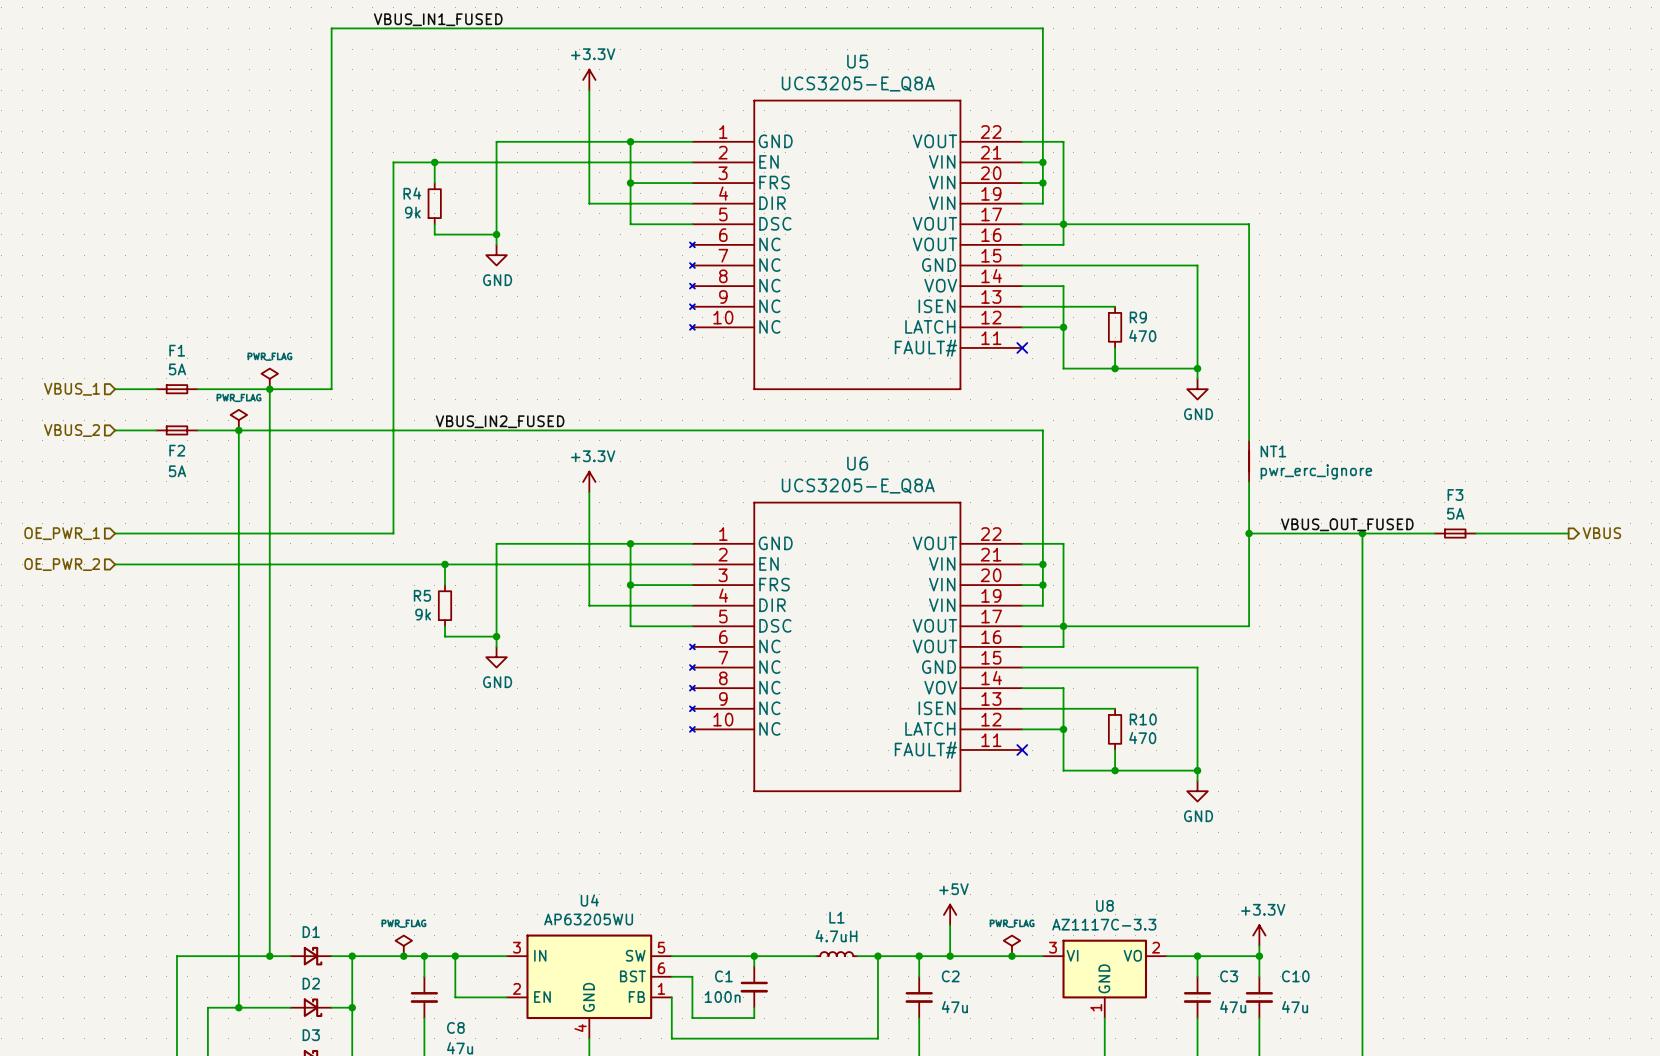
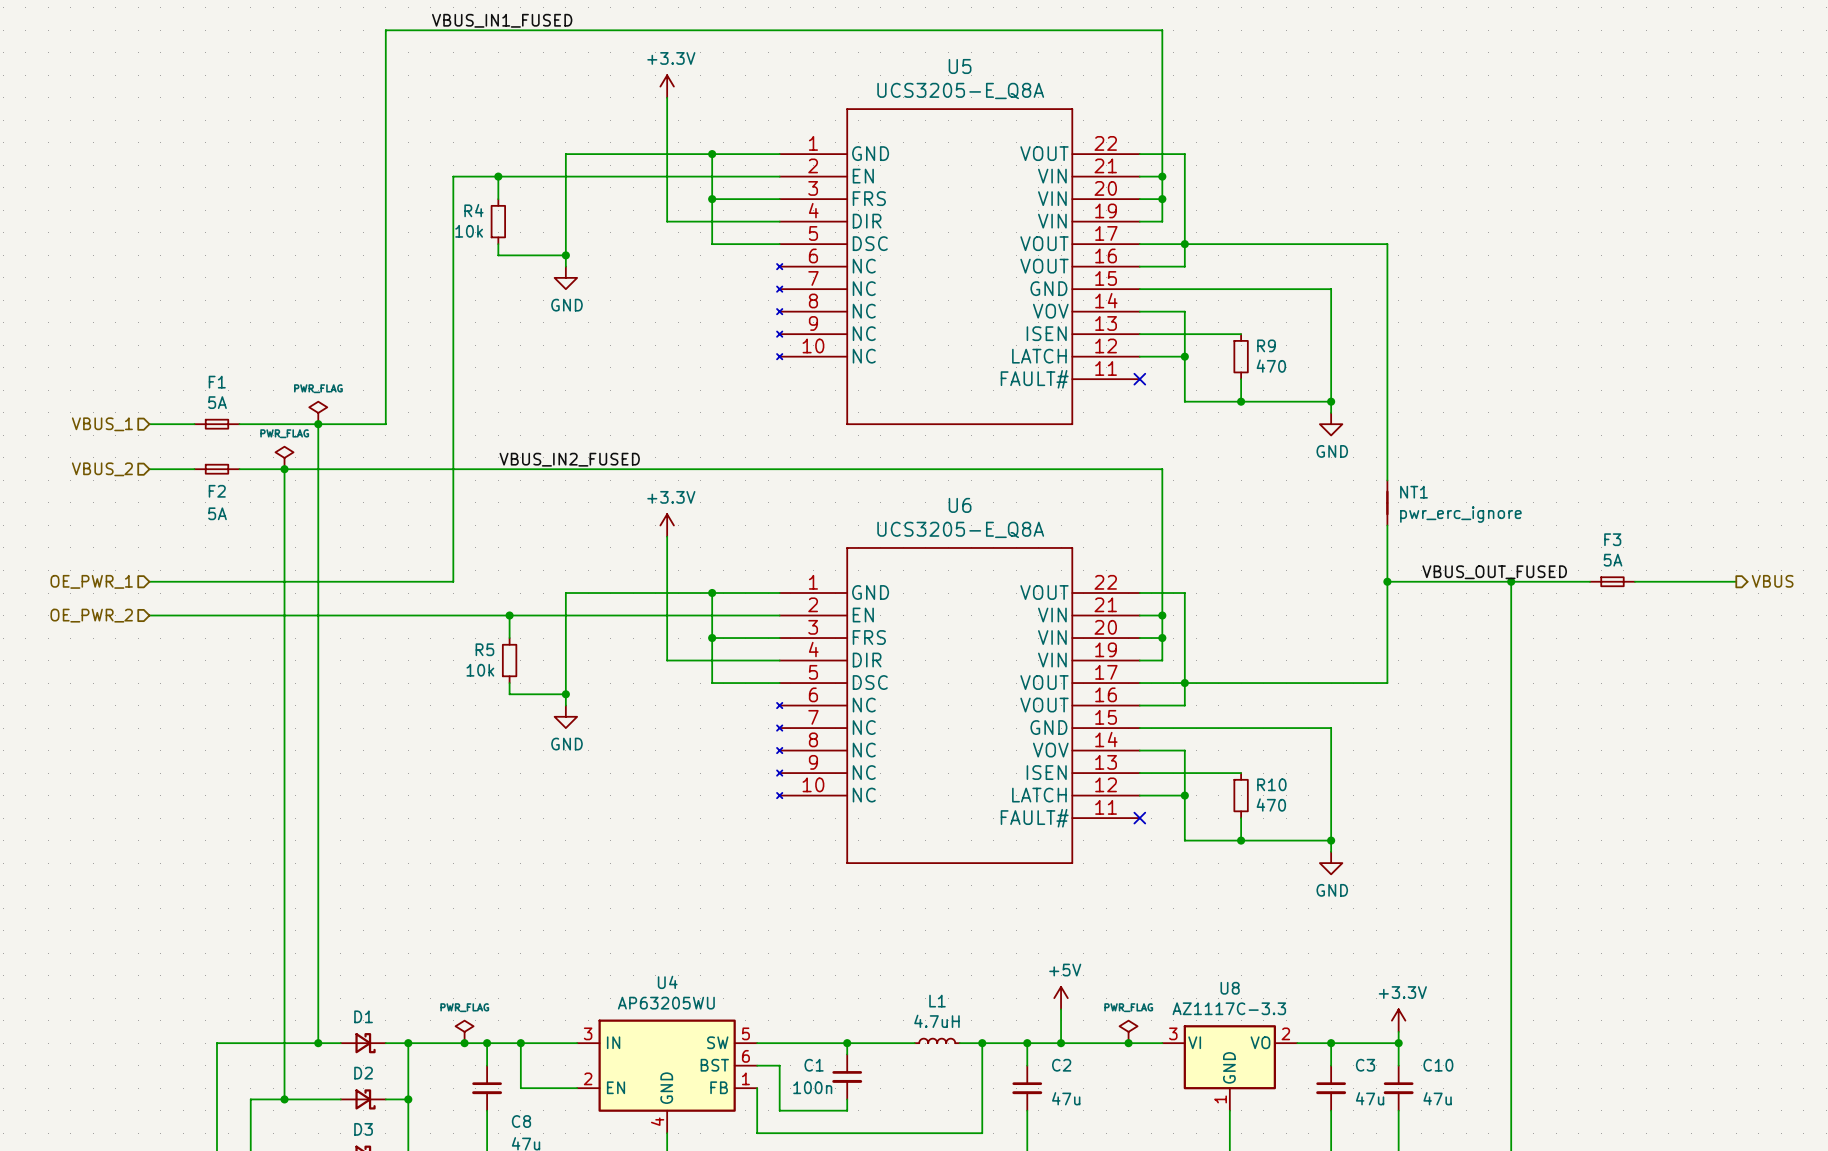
R4 value: 9k (412, 212) -> 10k (469, 231)
R5 value: 9k (423, 614) -> 10k (480, 670)

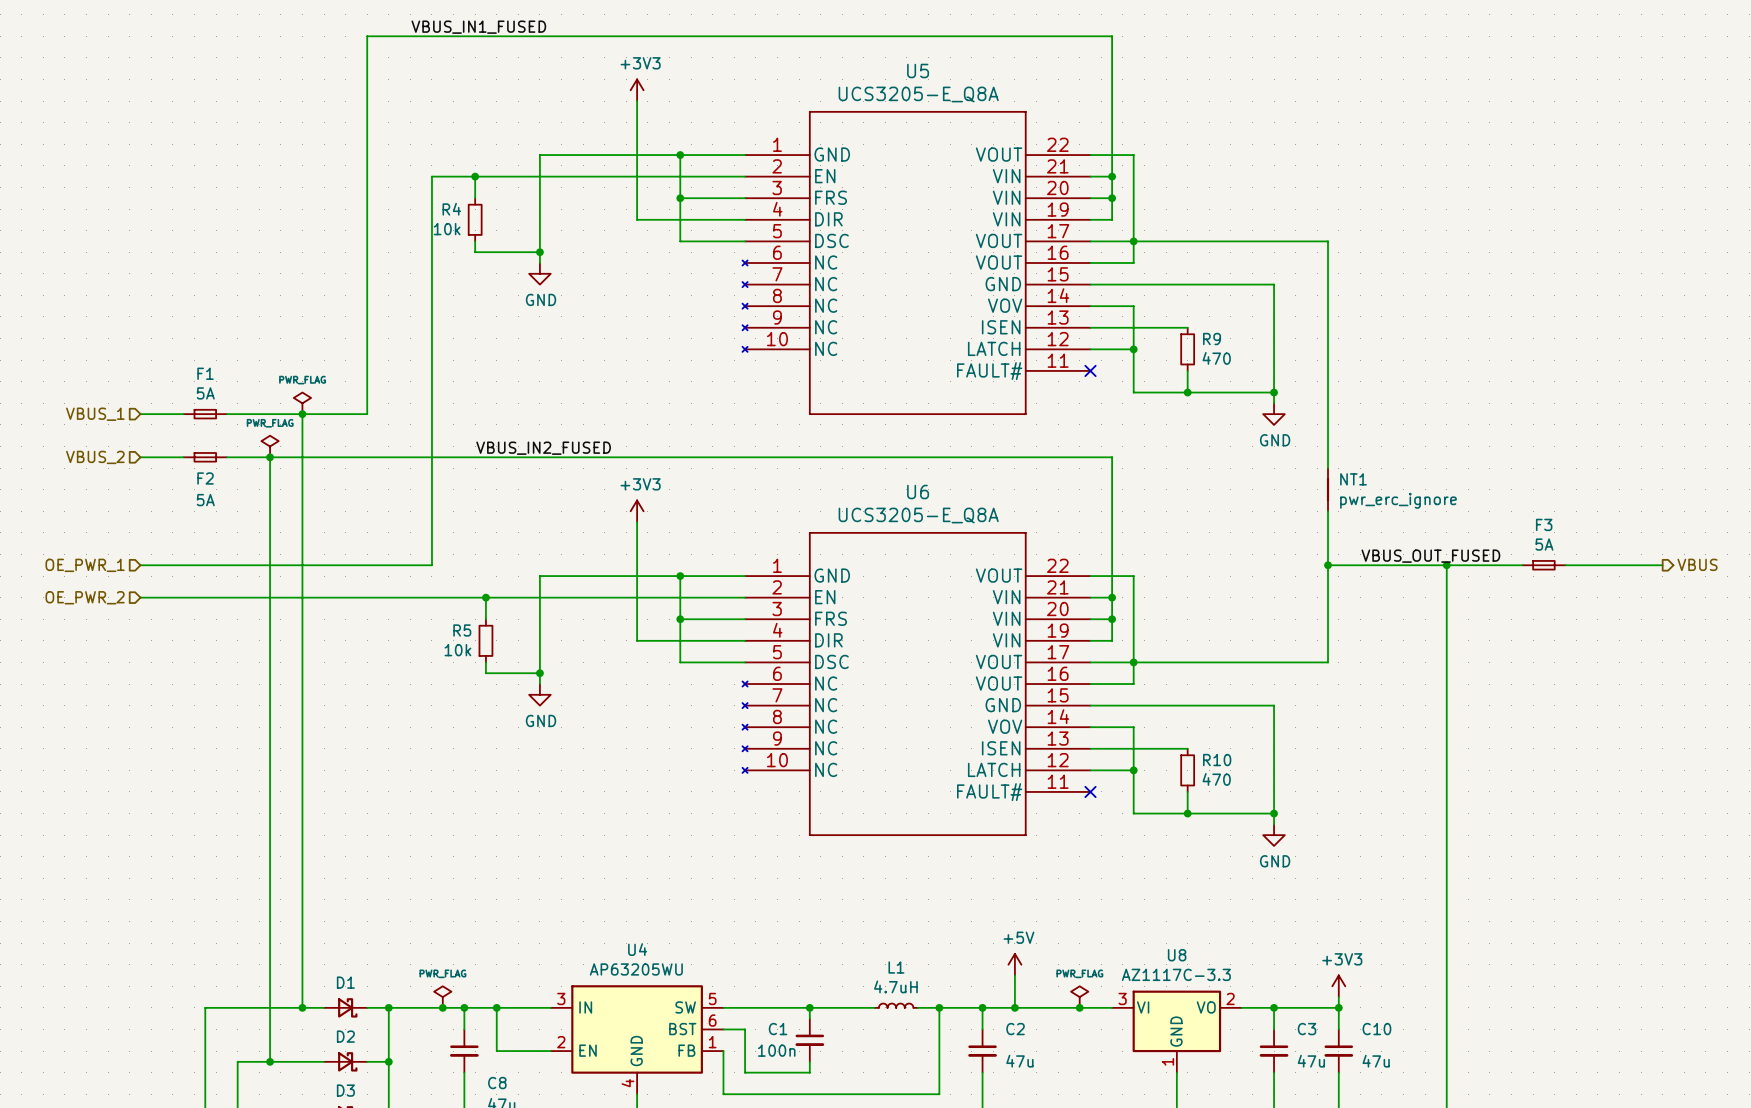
power symbol: +3.3V (667, 86) -> +3V3 (637, 90)
power symbol: +3.3V (667, 525) -> +3V3 (637, 511)
power symbol: +3.3V (1398, 1020) -> +3V3 (1338, 986)

